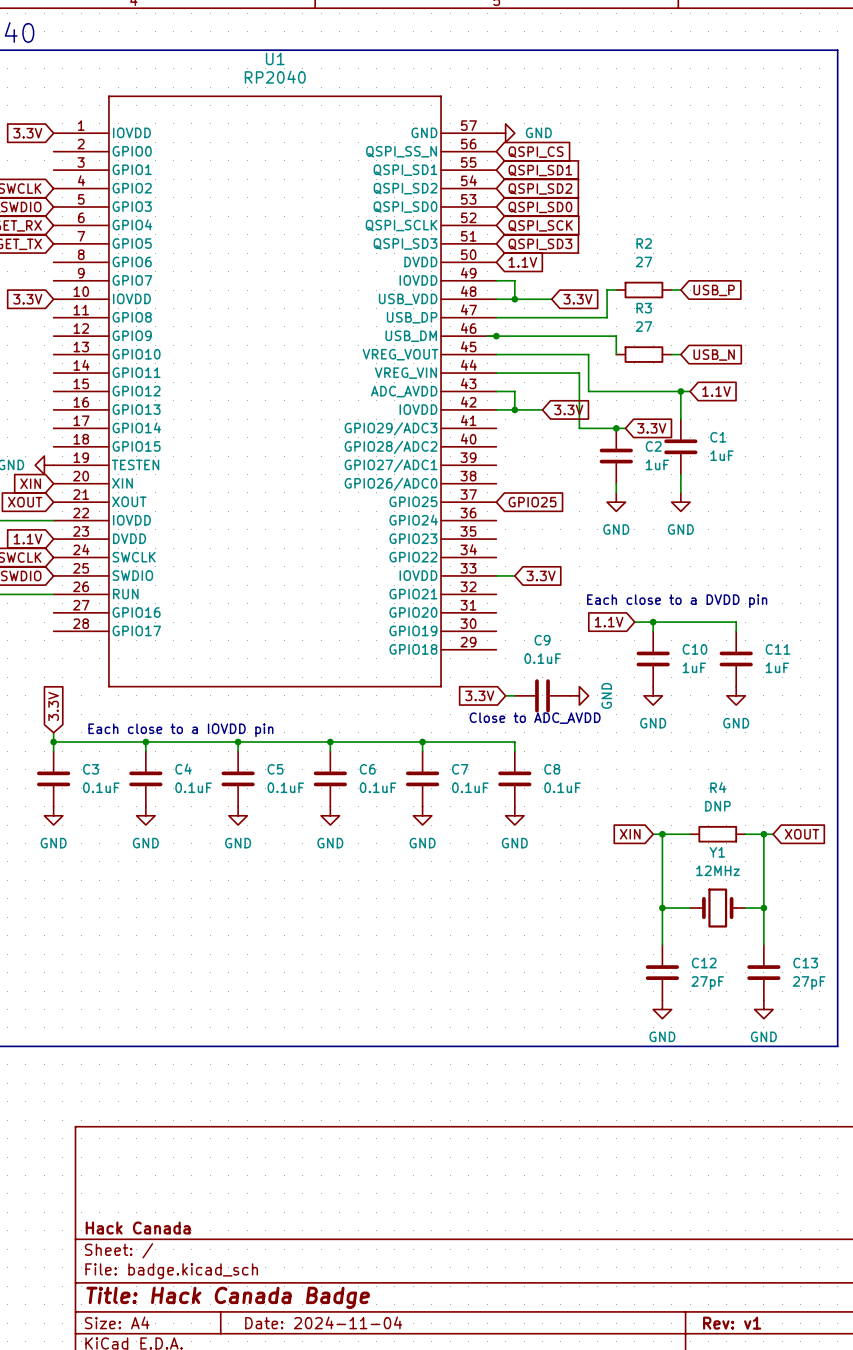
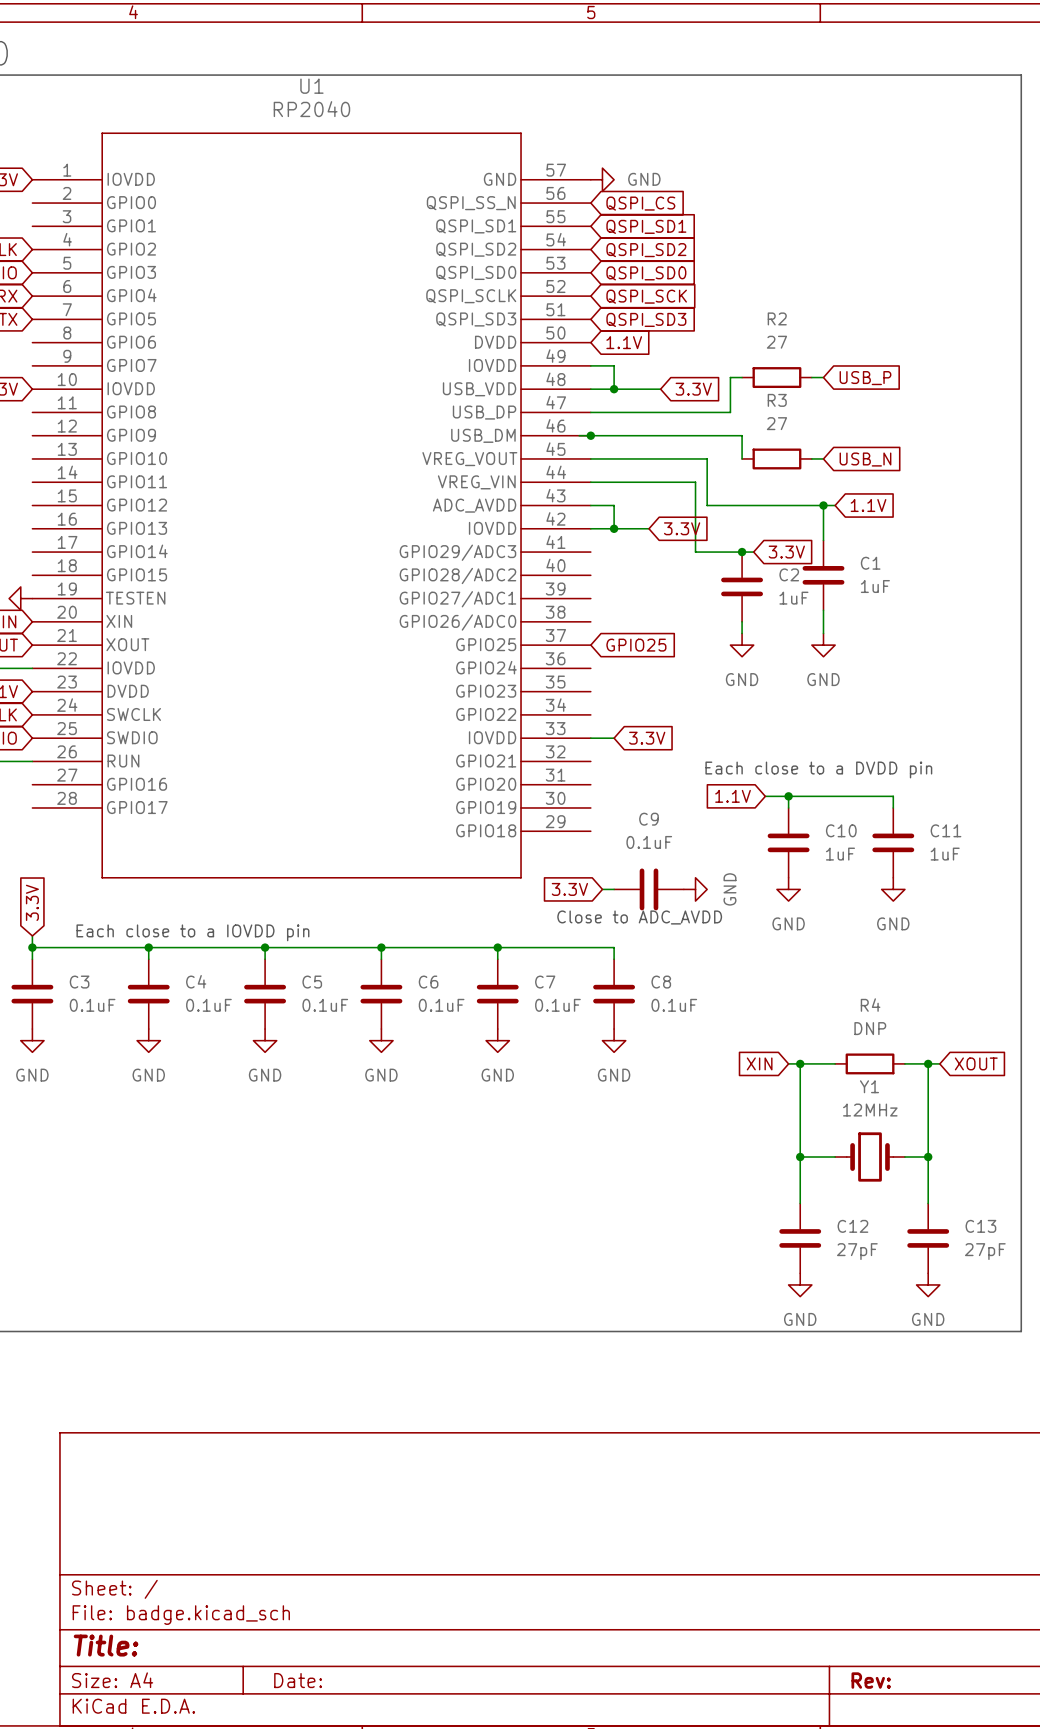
title block: Hack Canada (138, 1228) -> none
title block: Title: Hack Canada Badge (228, 1297) -> Title: (106, 1645)
title block: Date: 2024-11-04 (323, 1322) -> Date: (298, 1680)
title block: Rev: v1 (732, 1323) -> Rev: (871, 1680)

